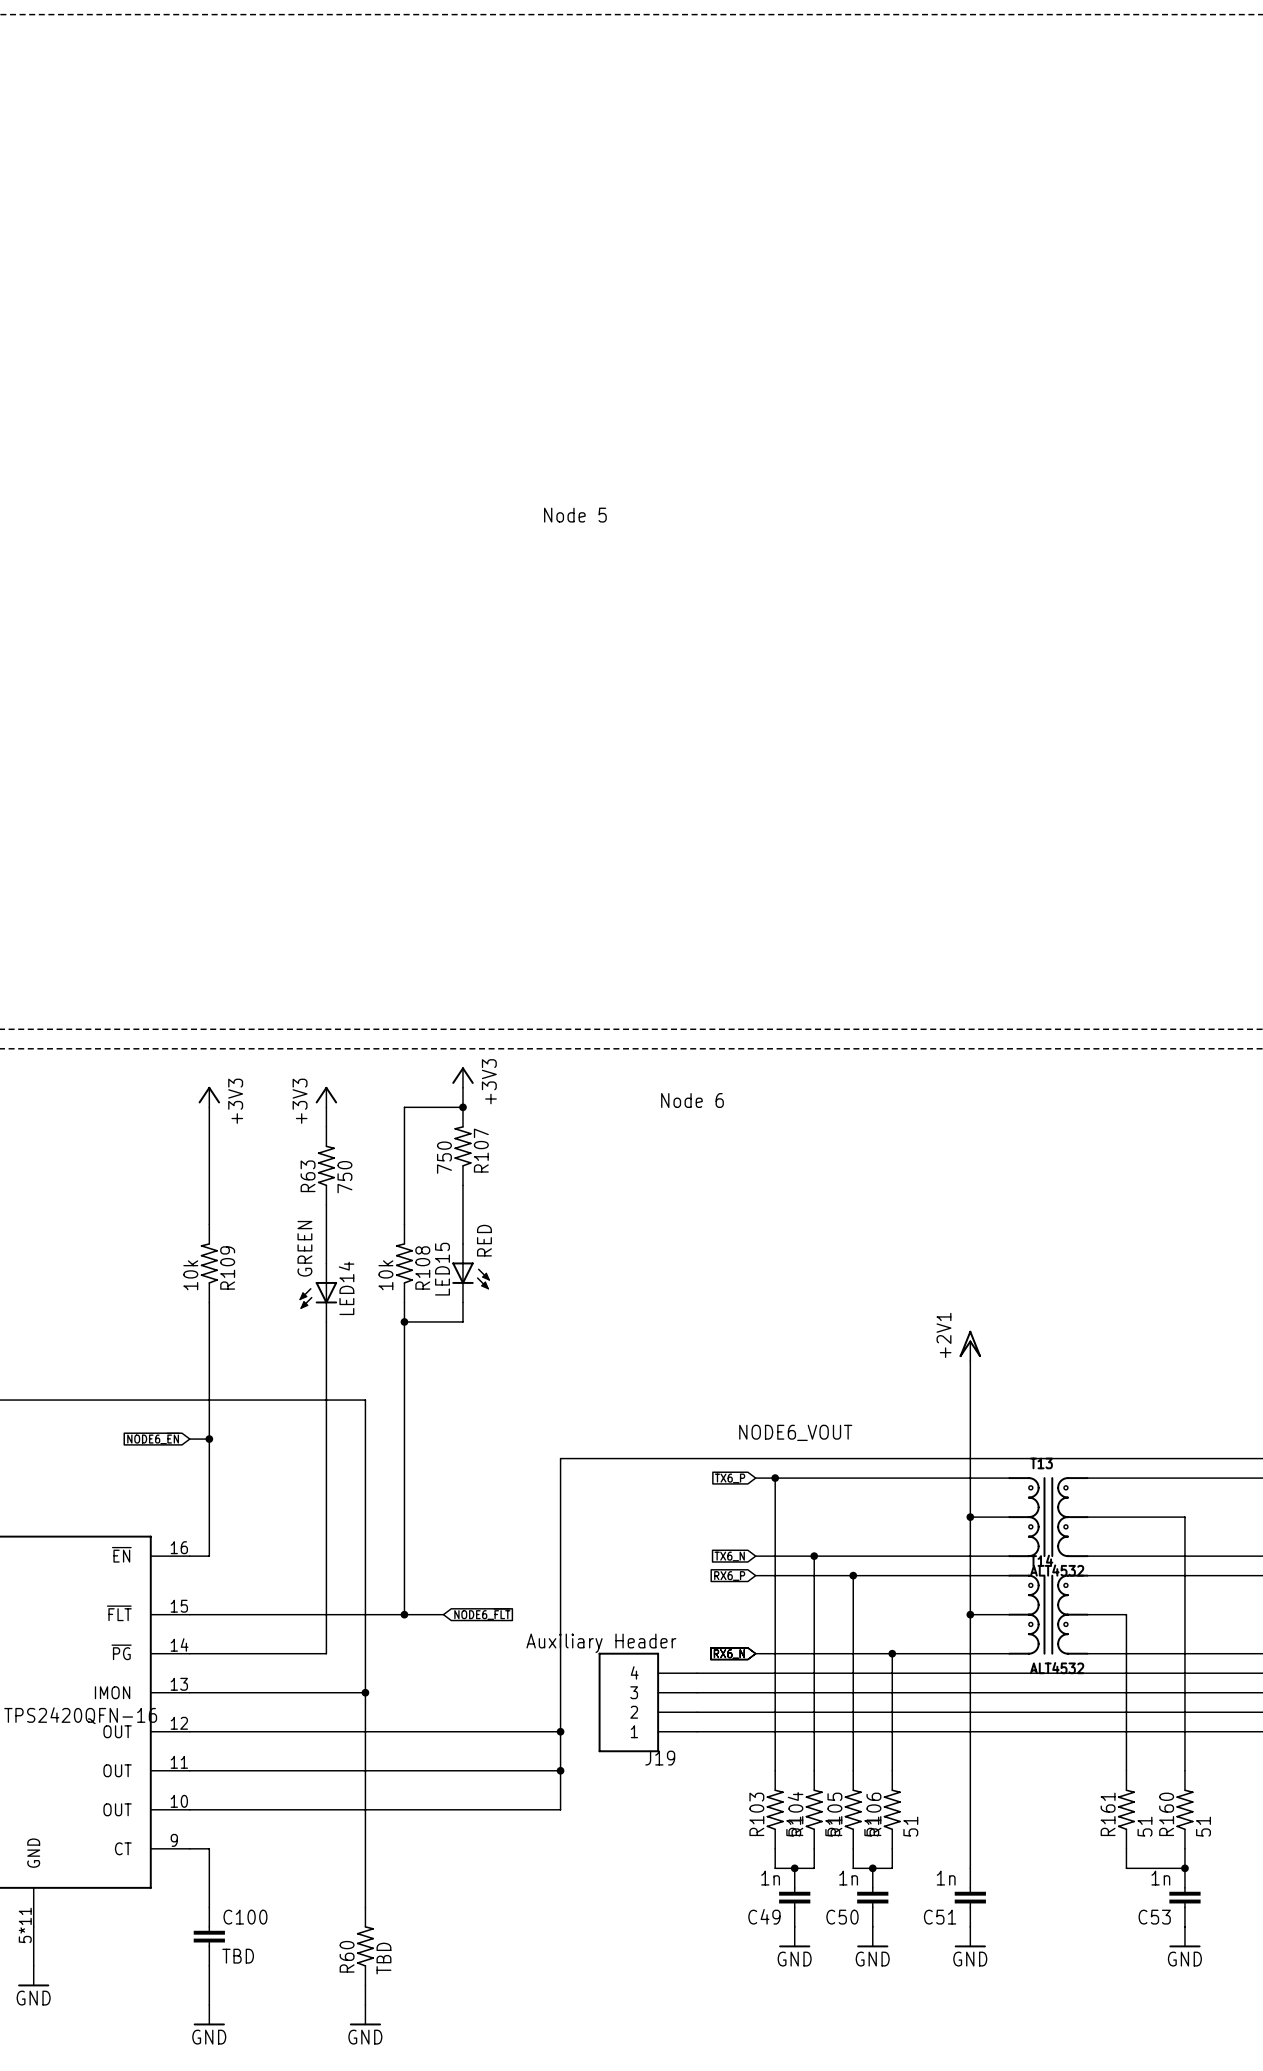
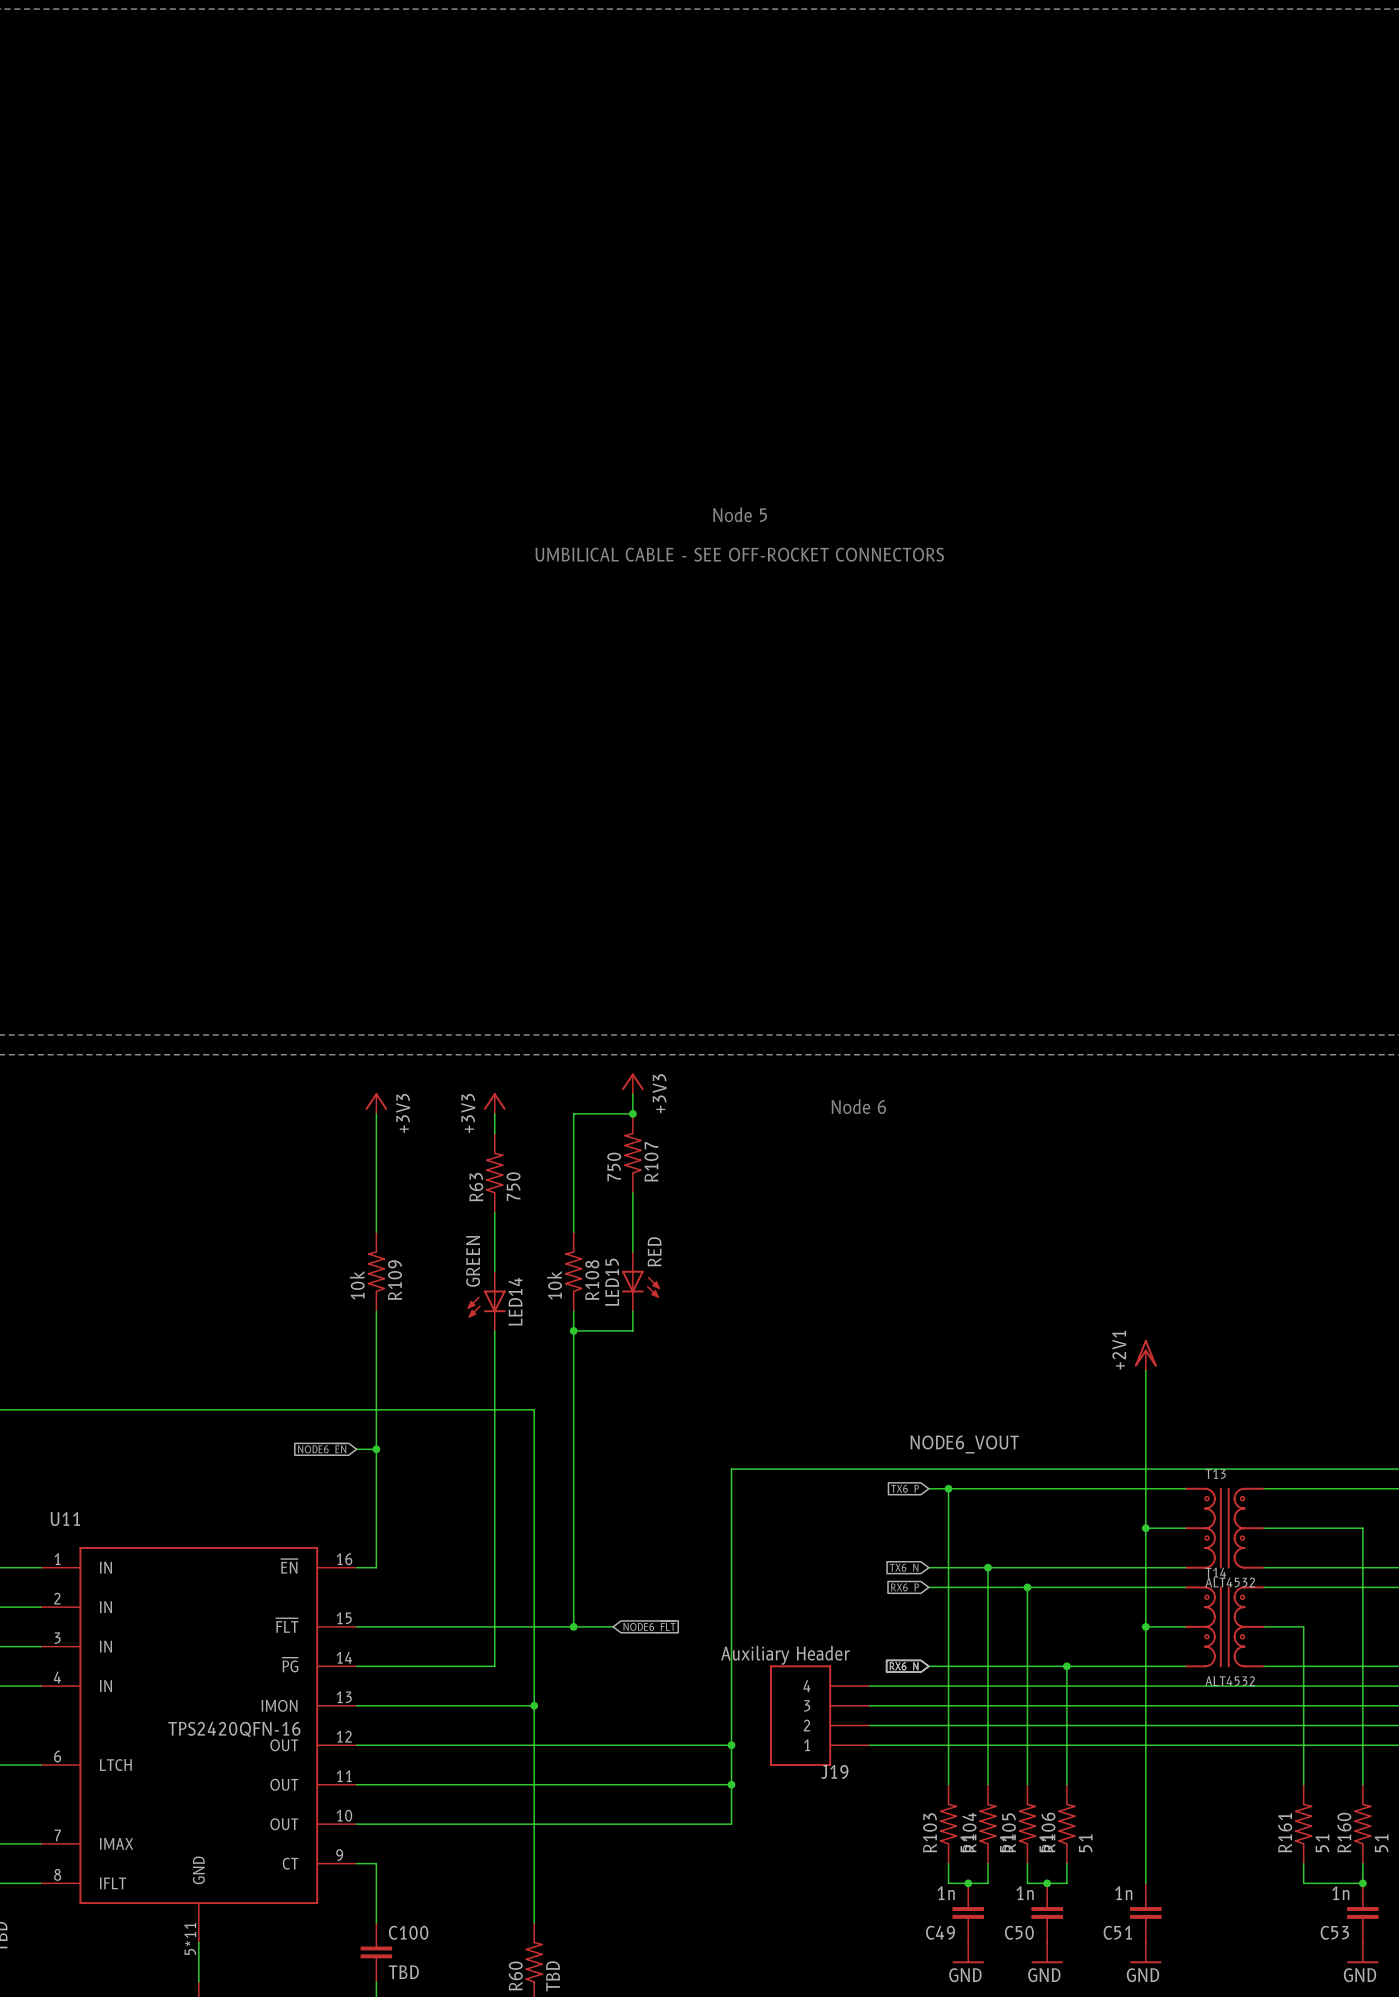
text: none -> UMBILICAL CABLE - SEE OFF-ROCKET CONNECTORS (739, 554)

